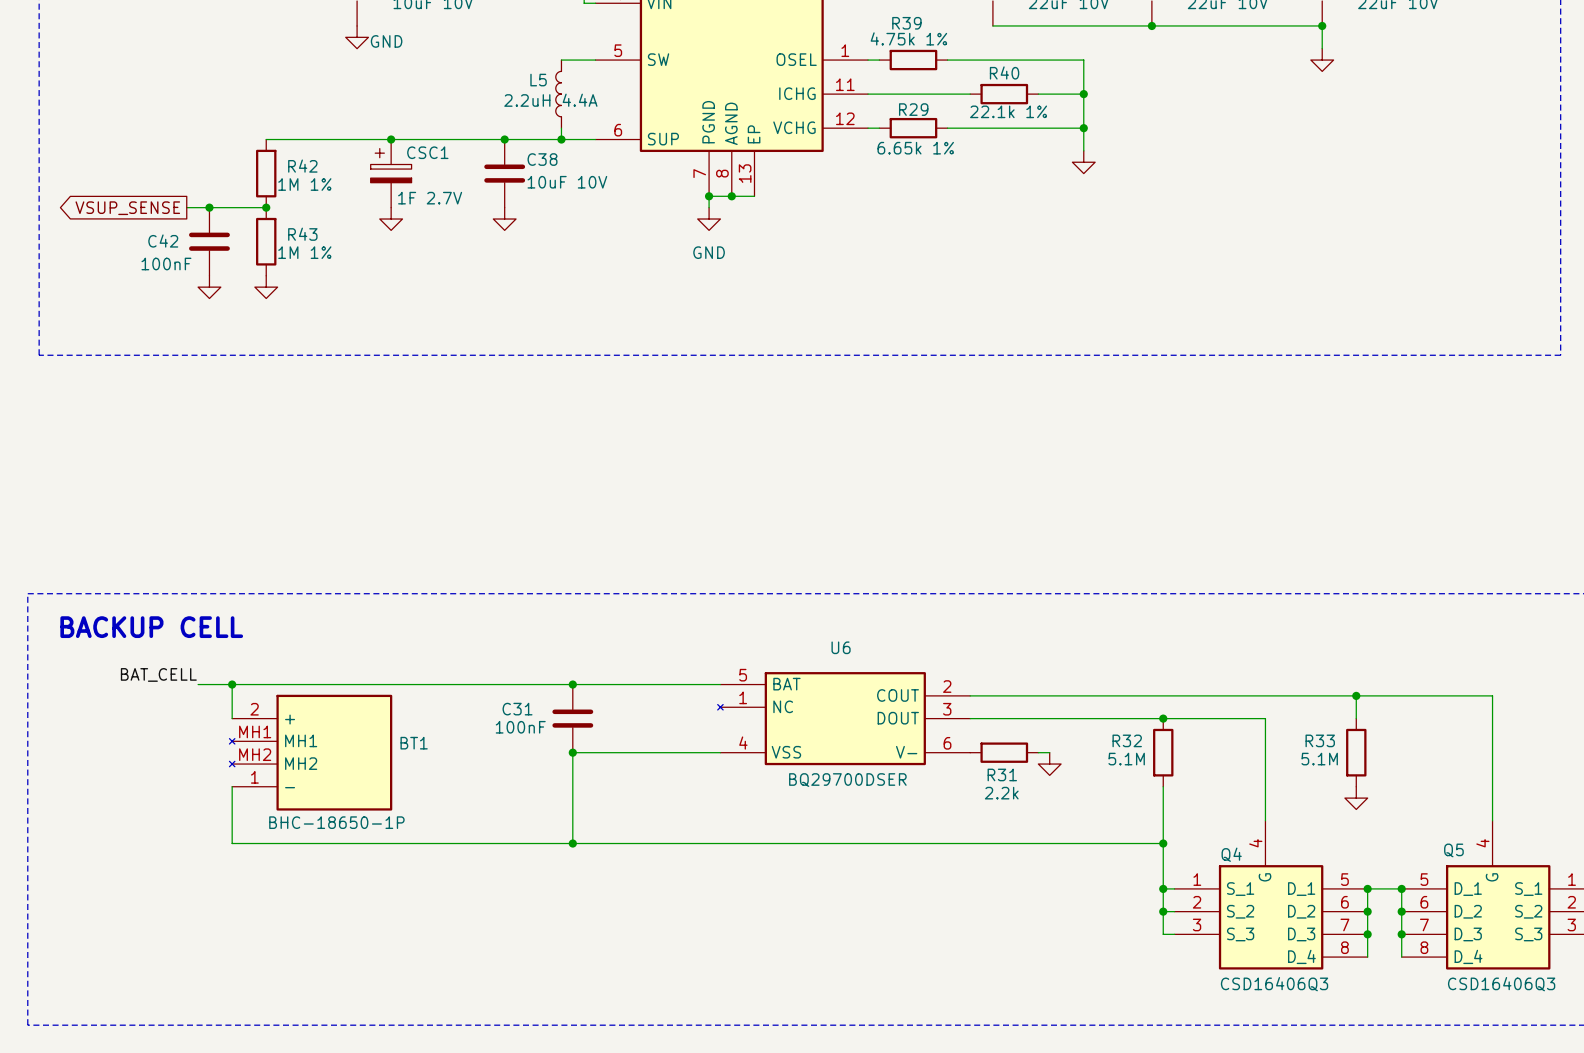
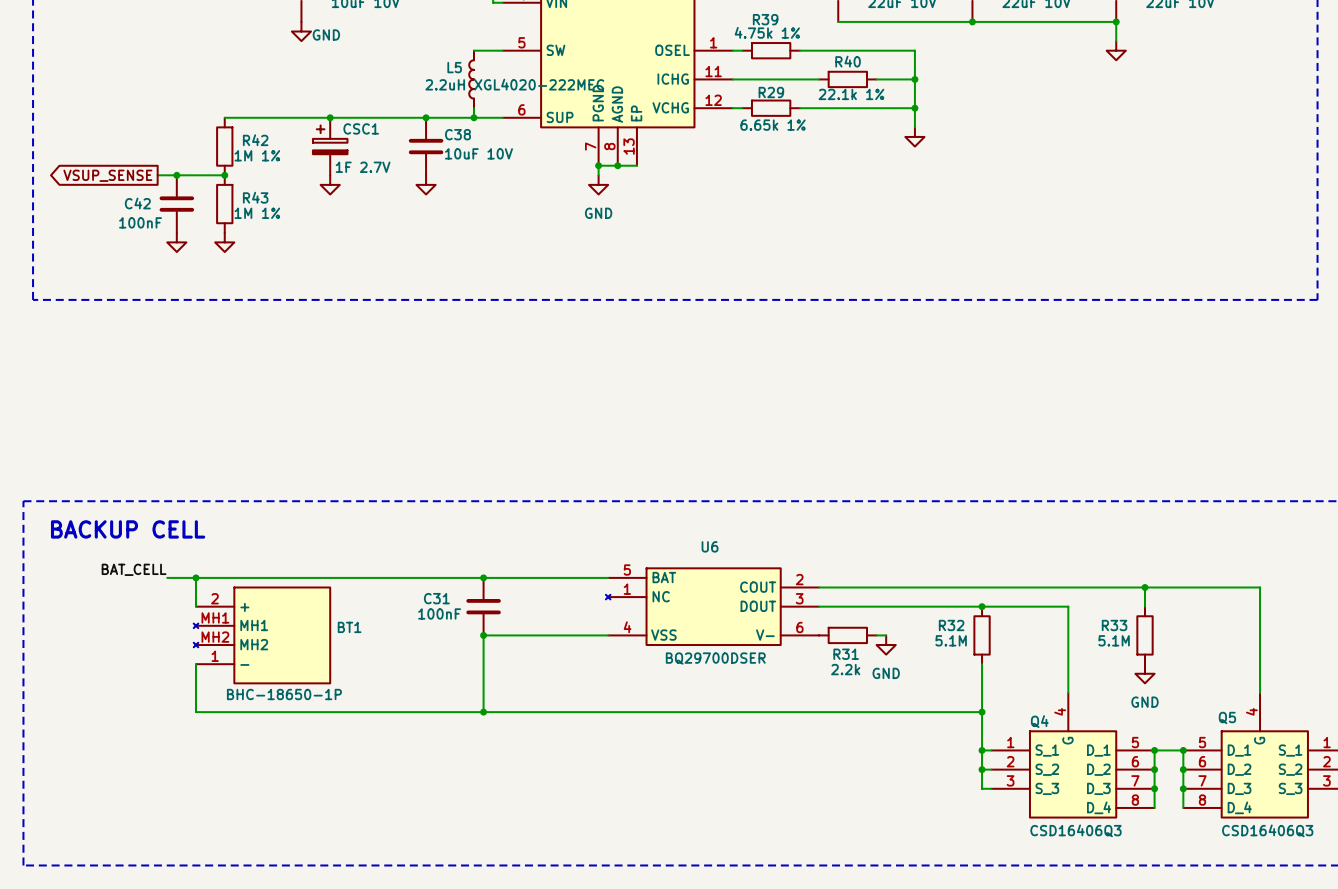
L5 value: 2.2uH 4.4A (550, 100) -> 2.2uH XGL4020-222MEC (514, 84)
power symbol text: none -> GND (886, 673)
power symbol text: none -> GND (1145, 702)

